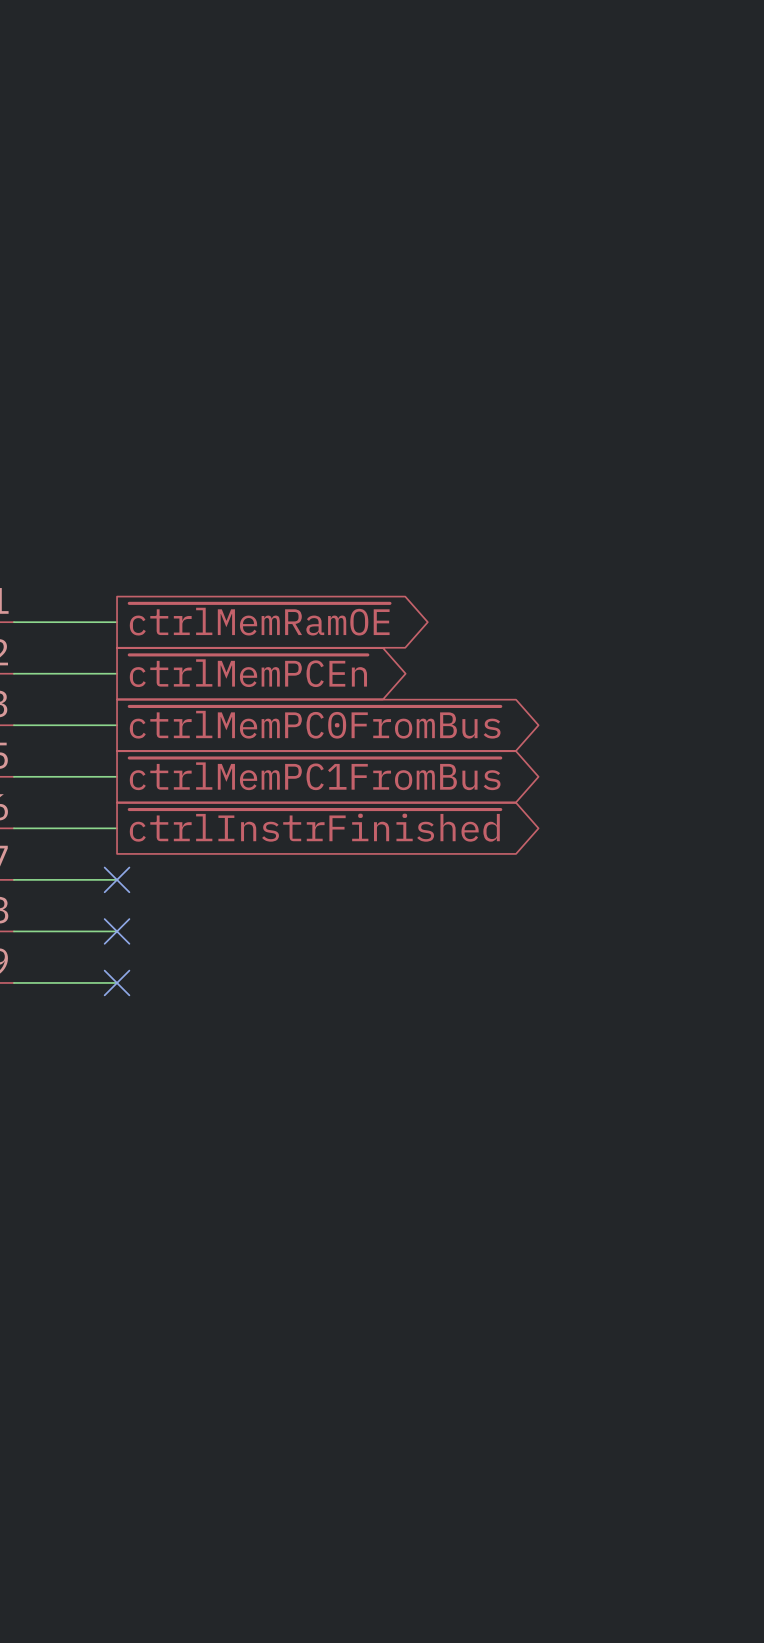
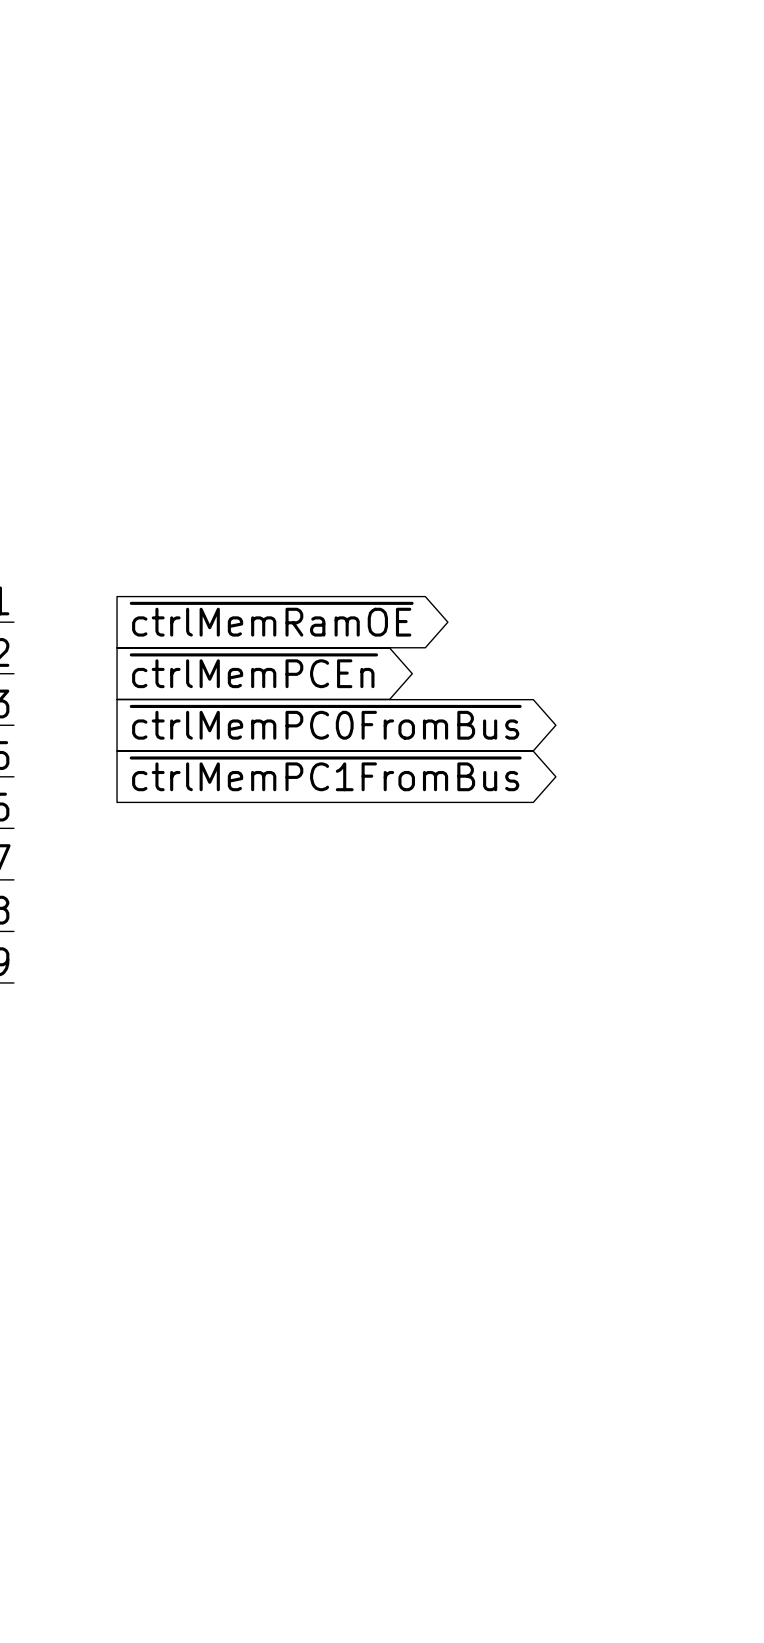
wire: (13, 622) (117, 622) -> none
wire: (13, 673) (117, 673) -> none
wire: (13, 725) (117, 725) -> none
wire: (13, 776) (117, 776) -> none
global label: ~{ctrlInstrFinished} (315, 825) -> none
wire: (13, 828) (117, 828) -> none
wire: (13, 879) (117, 879) -> none
no-connect mark: (117, 879) -> none
wire: (13, 931) (117, 931) -> none
no-connect mark: (117, 931) -> none
wire: (13, 982) (117, 982) -> none
no-connect mark: (117, 982) -> none

